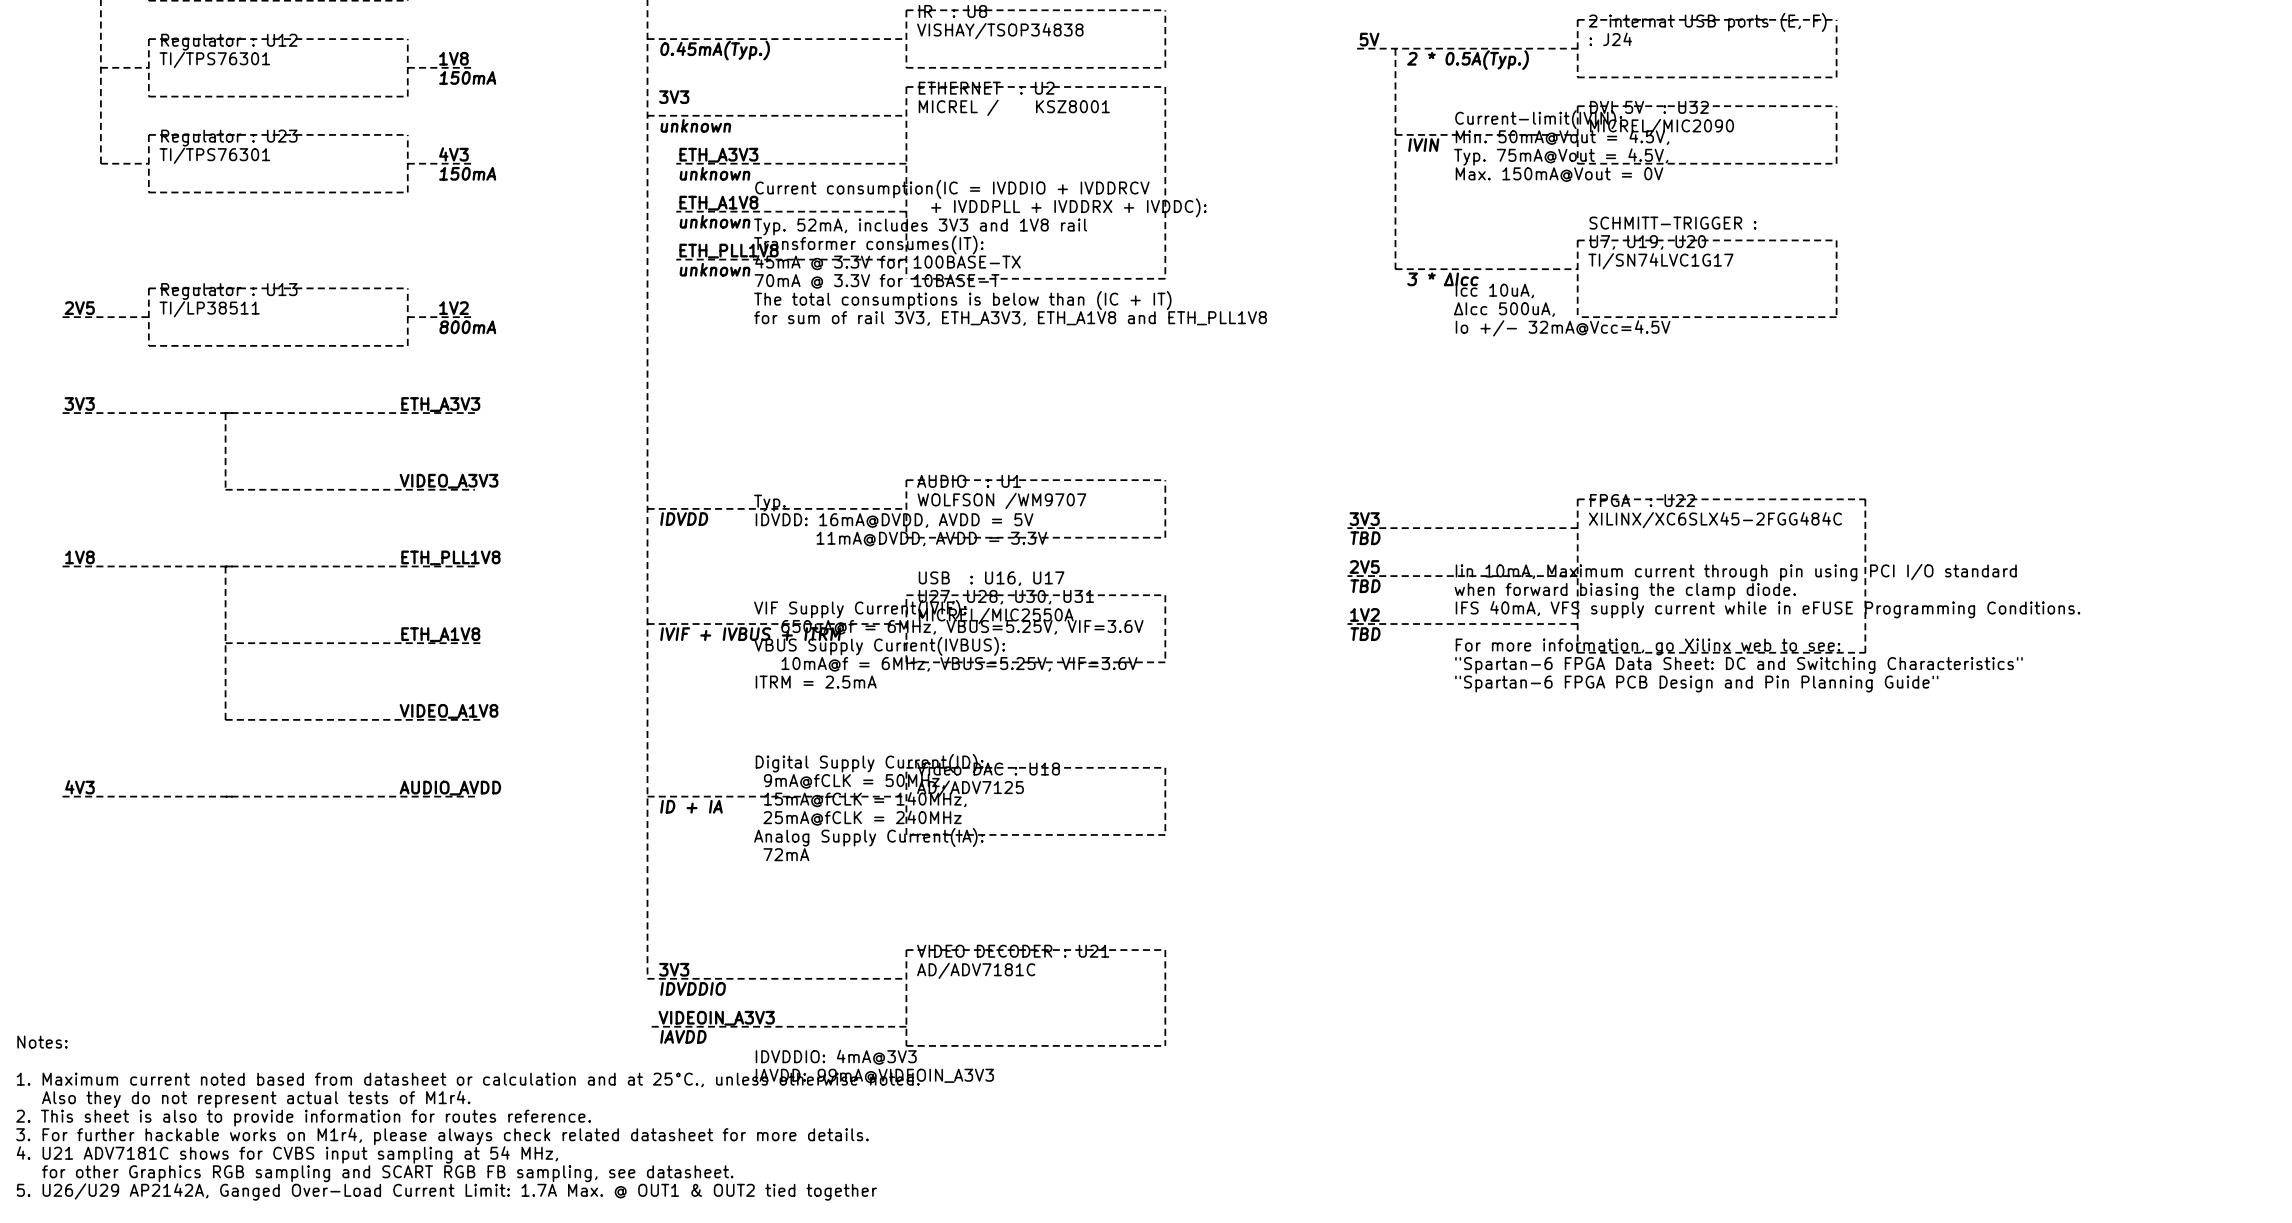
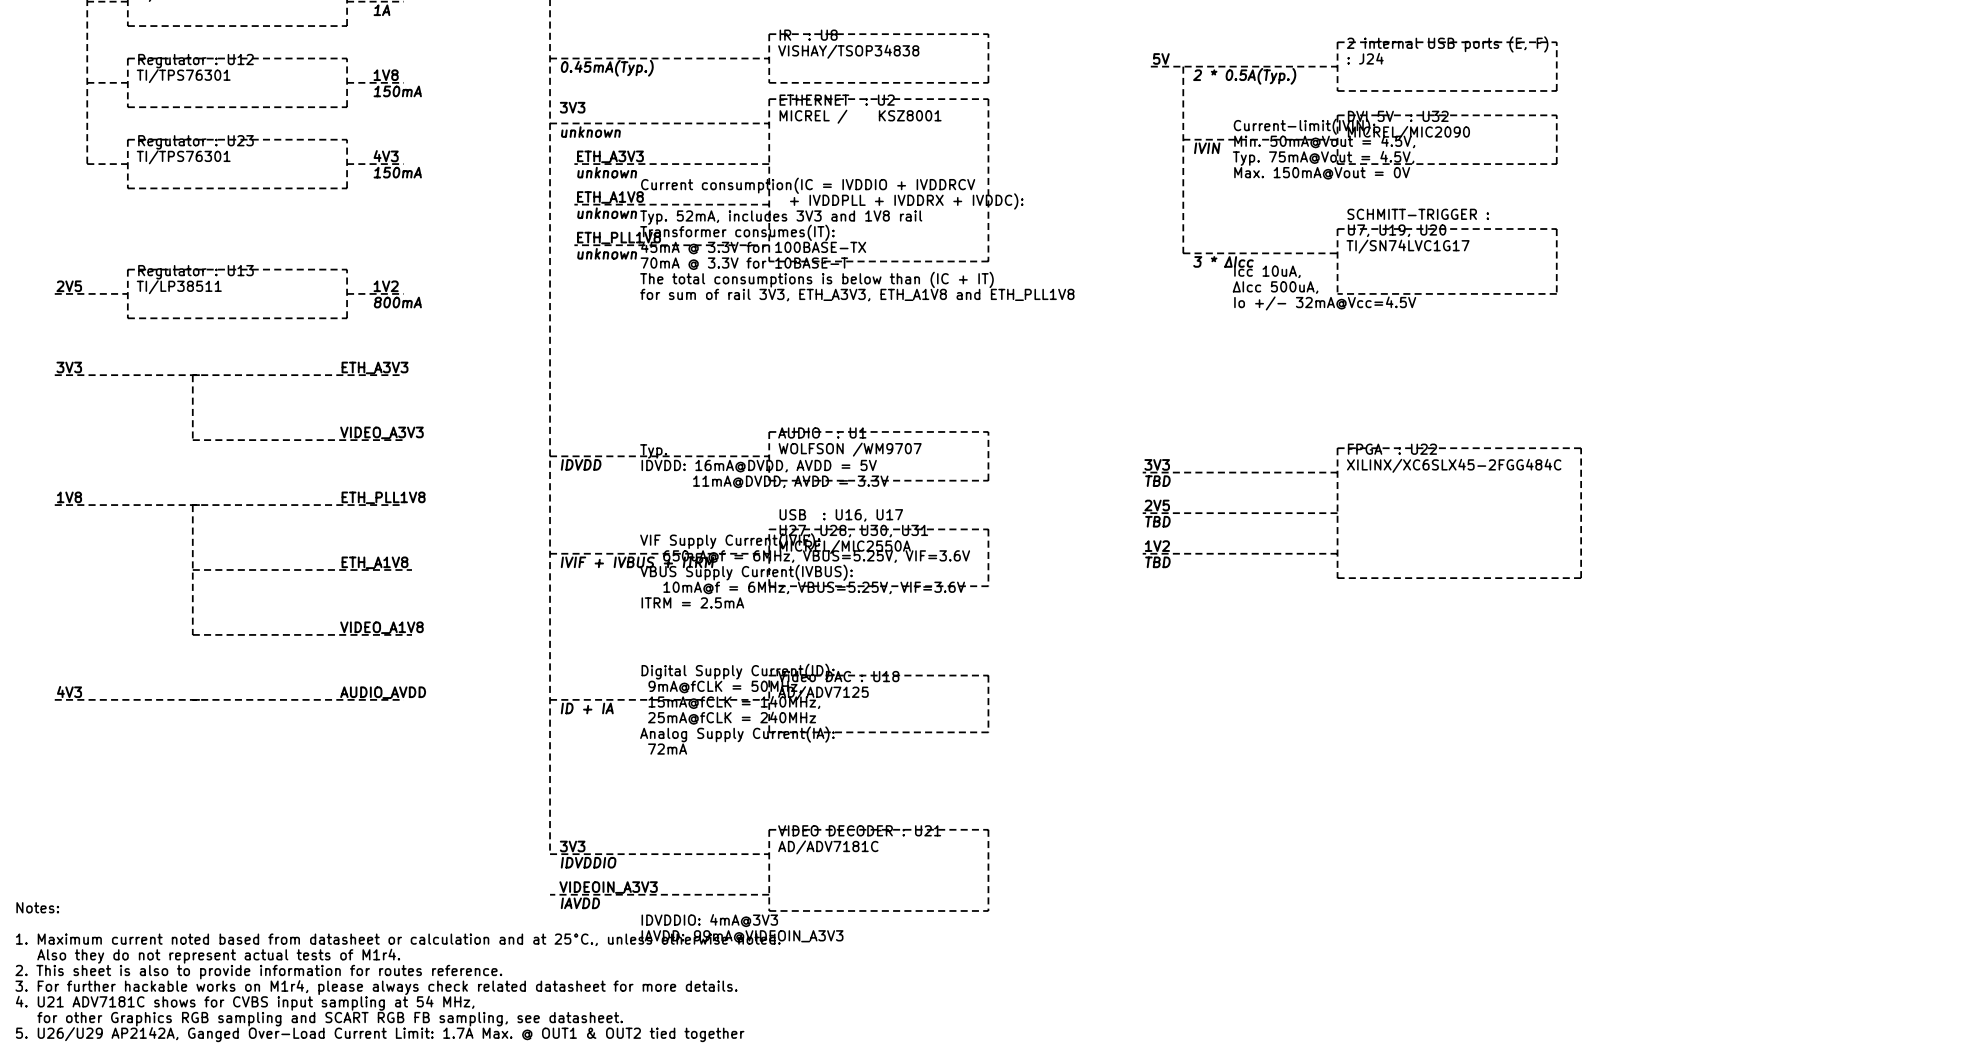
text: Iin 10mA, Maximum current through pin using PCI I/O standard (1736, 572) -> none
text: when forward biasing the clamp diode. (1625, 591) -> none
text: IFS 40mA, VFS supply current while in eFUSE Programming Conditions. (1768, 609) -> none
text: For more information, go Xilinx web to see: (1648, 646) -> none
text: "Spartan-6 FPGA Data Sheet: DC and Switching Characteristics" (1738, 665) -> none
text: "Spartan-6 FPGA PCB Design and Pin Planning Guide" (1696, 684) -> none

